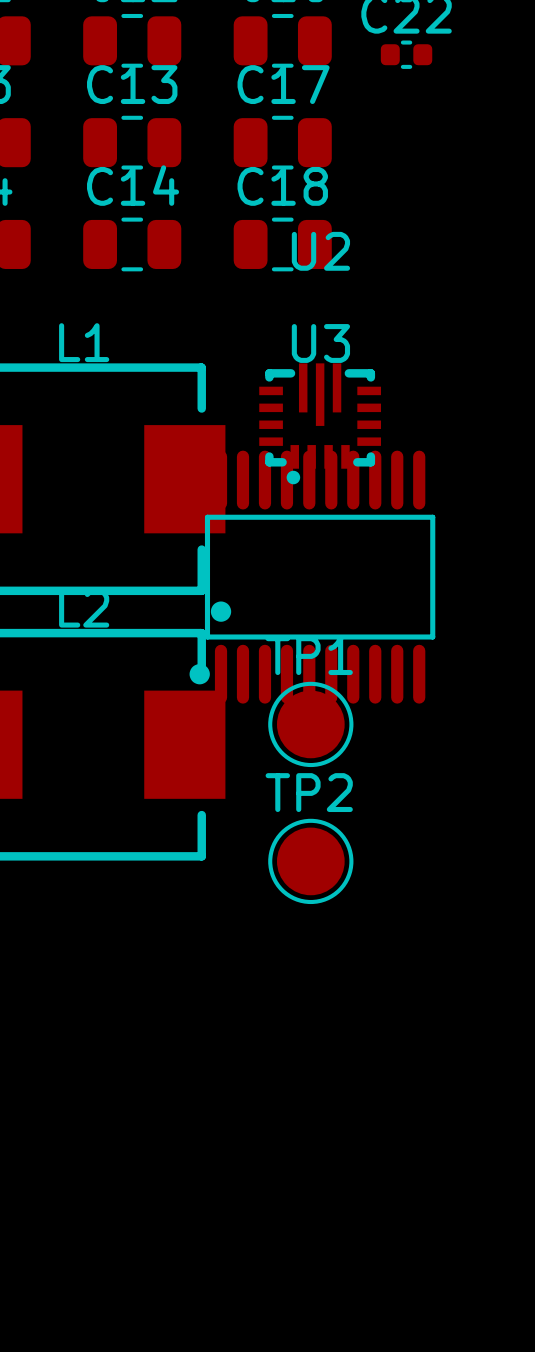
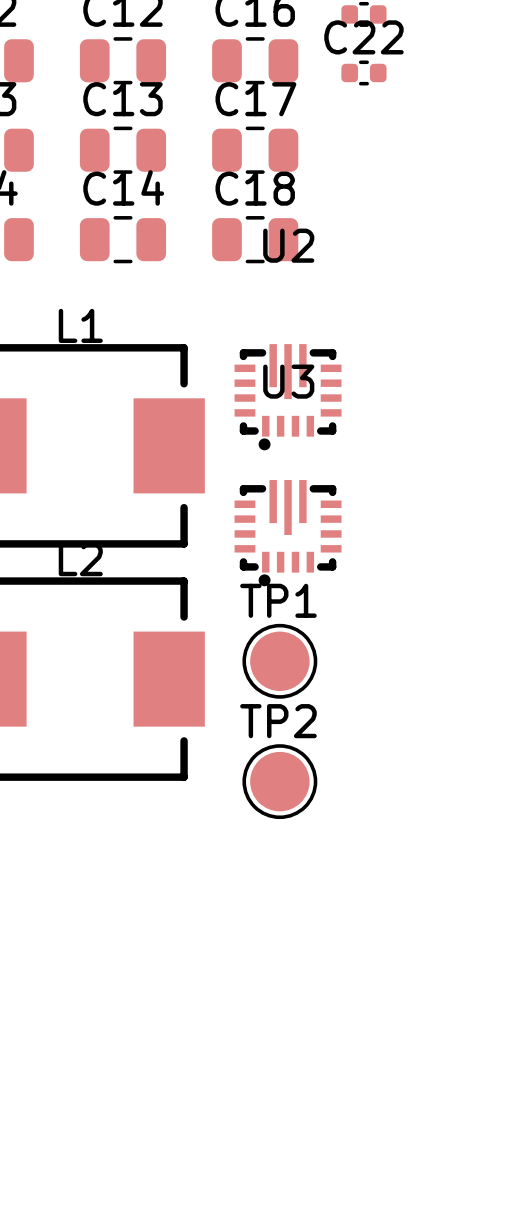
U3 footprint: [189, 450, 436, 704] -> [234, 480, 342, 587]

